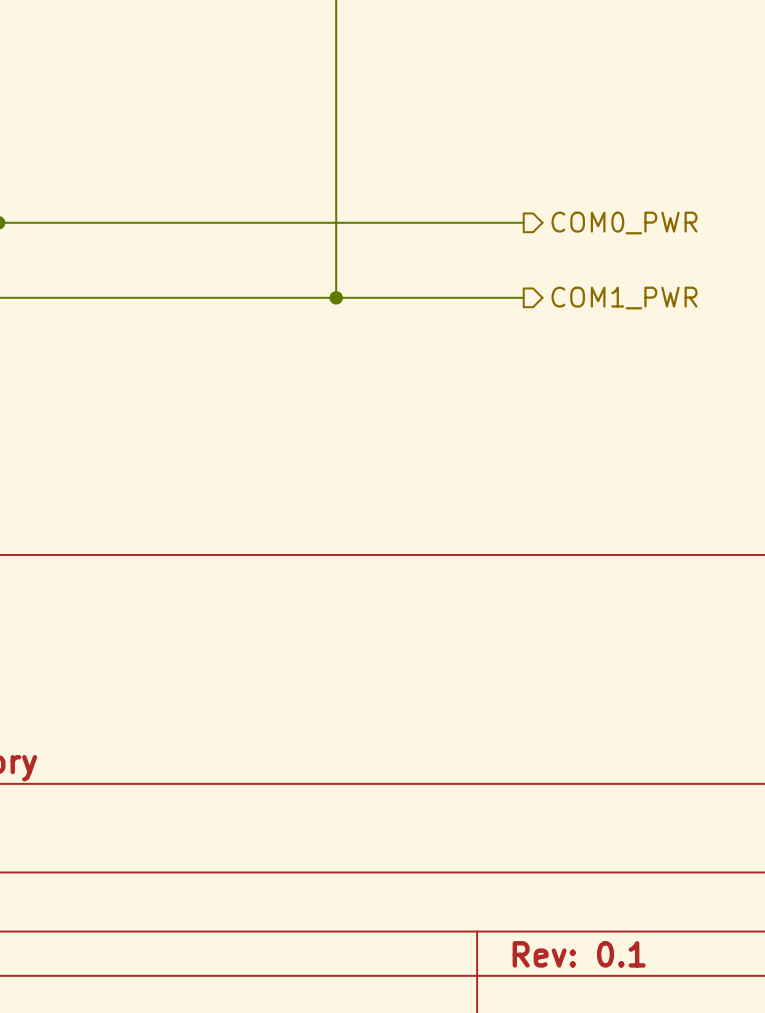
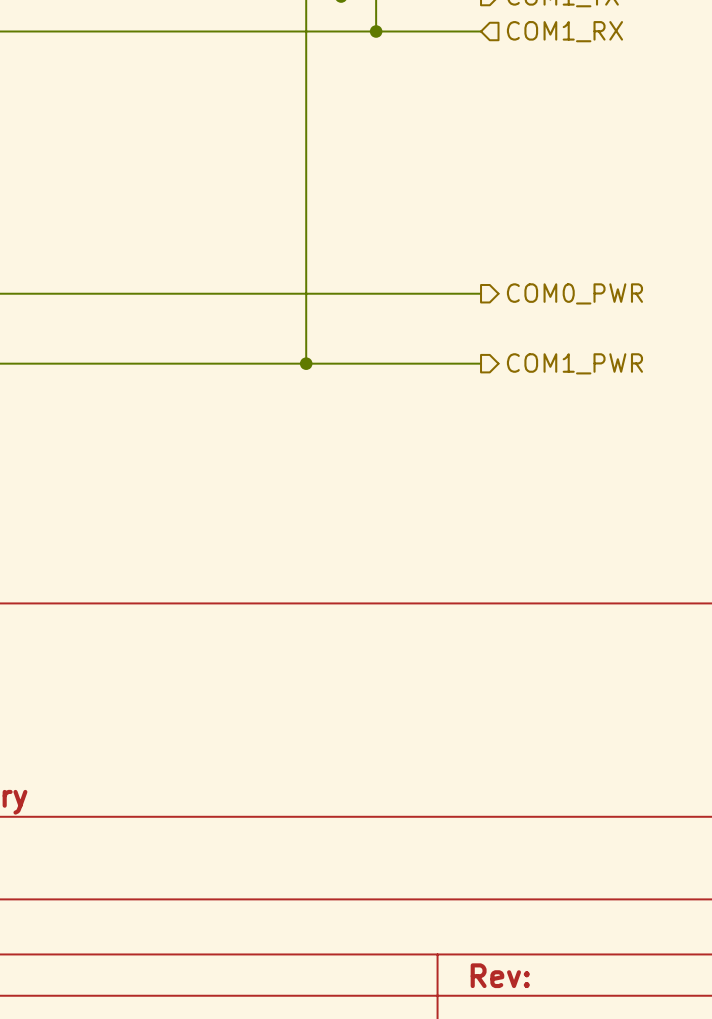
title block: Rev: 0.1 (579, 954) -> Rev: (500, 975)

